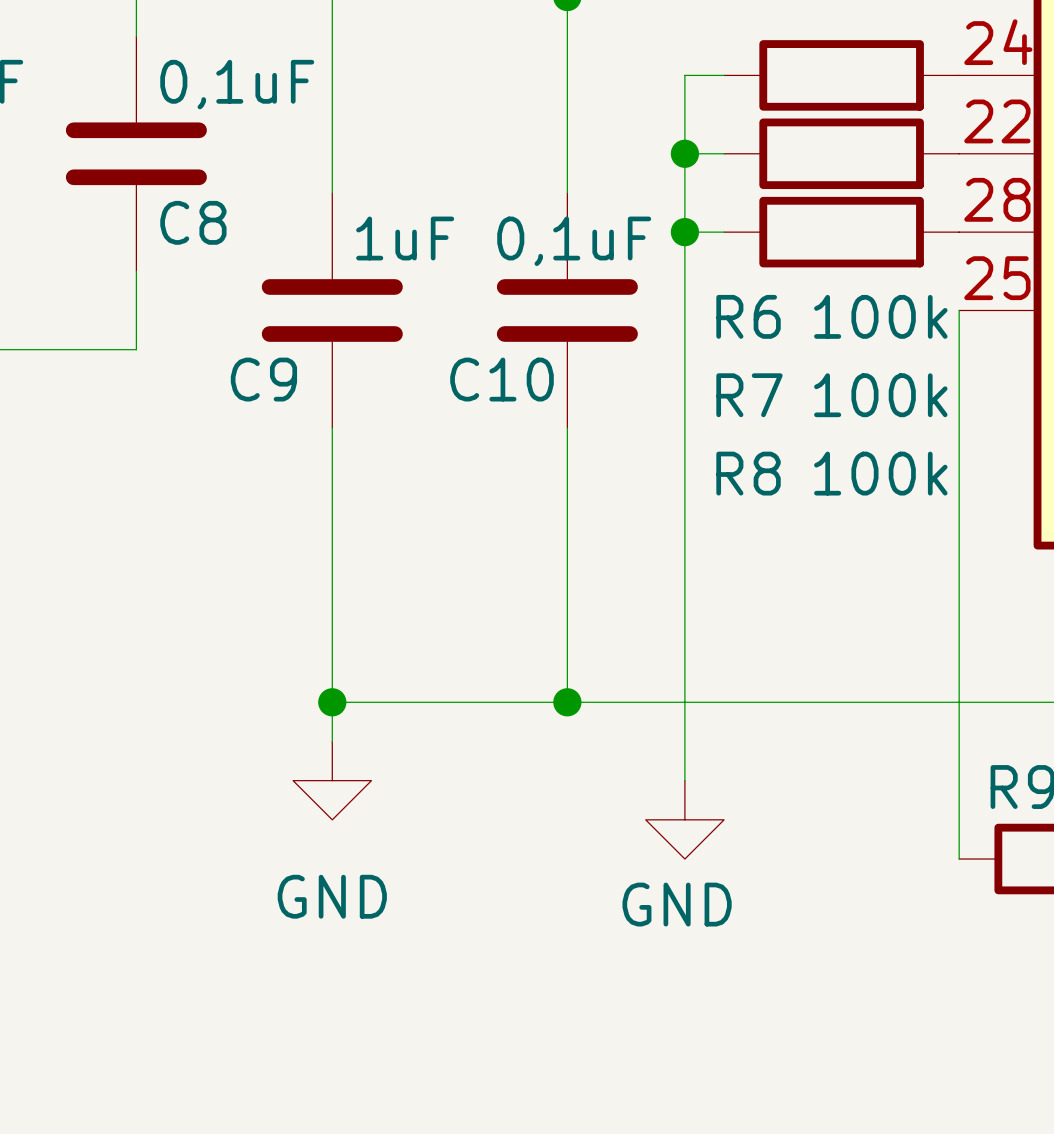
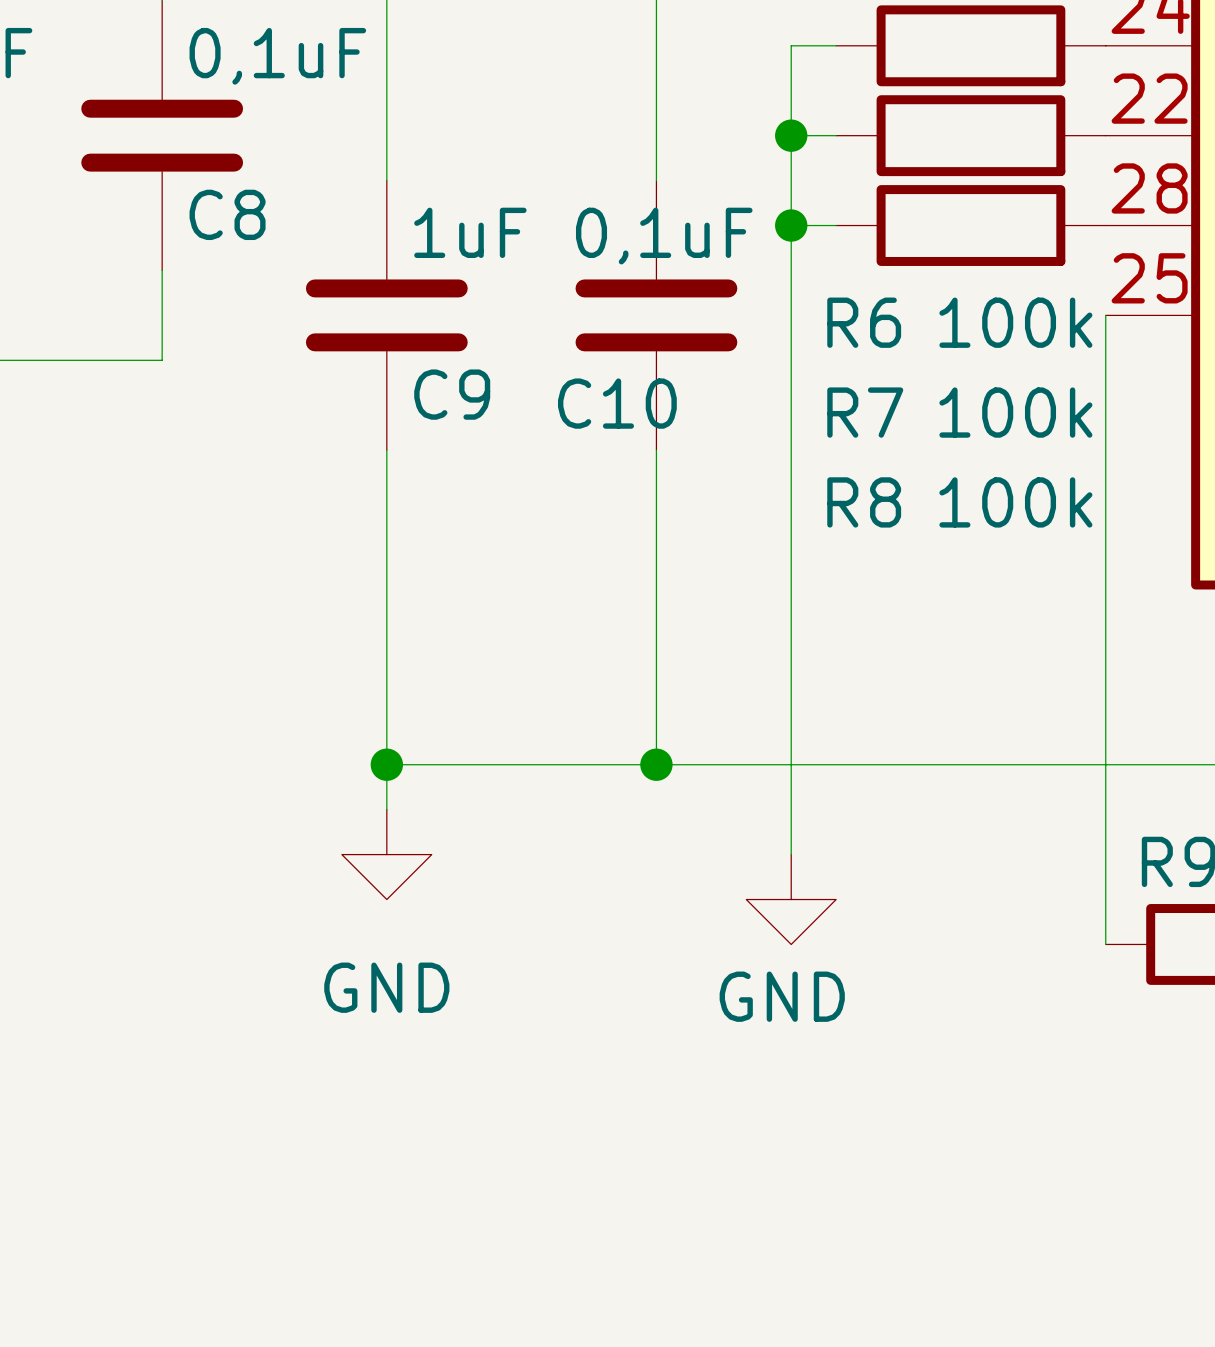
C9 name position: C9 (263, 379) -> C9 (452, 394)
C10 name position: C10 (501, 379) -> C10 (617, 403)

